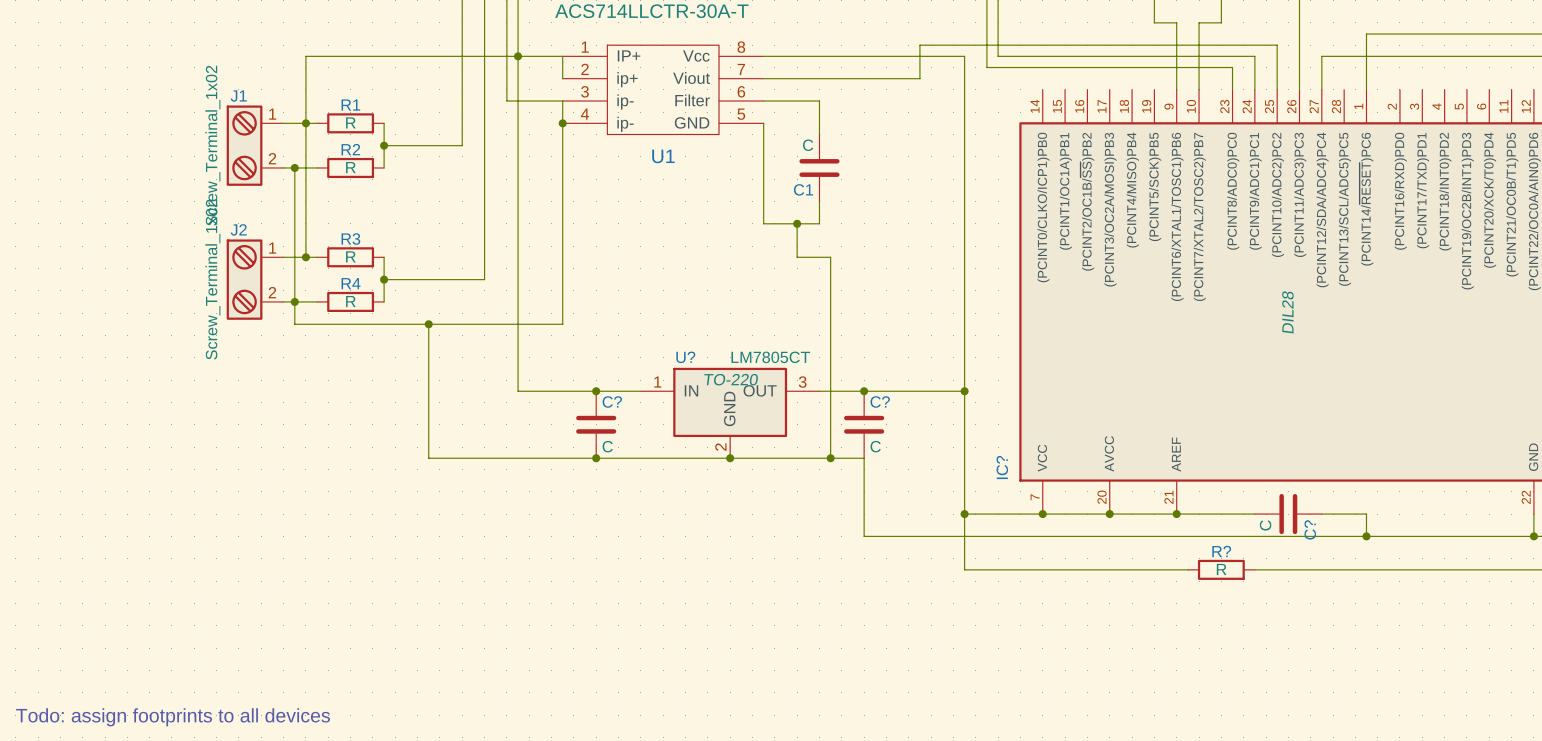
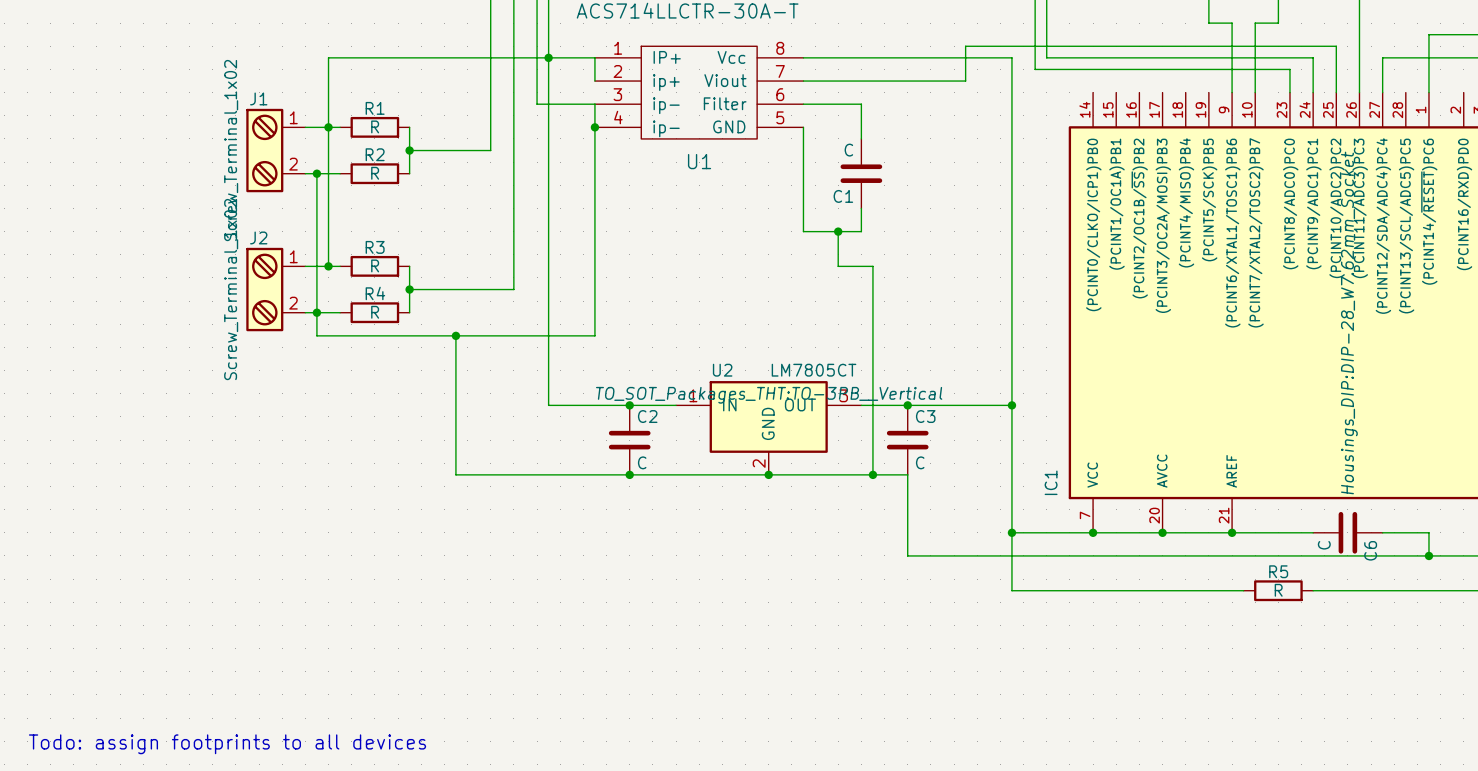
IC? text: DIL28 (1287, 312) -> Housings_DIP:DIP-28_W7.62mm_Socket (1349, 322)
U? name: U? (685, 357) -> U2 (722, 370)
U? text: TO-220 (731, 379) -> TO_SOT_Packages_THT:TO-3PB__Vertical (769, 395)
C? name: C? (612, 402) -> C2 (647, 416)
C? name: C? (880, 402) -> C3 (925, 416)
IC? name: IC? (1002, 467) -> IC1 (1051, 482)
C? name: C? (1310, 529) -> C6 (1370, 550)
R? name: R? (1221, 551) -> R5 (1278, 571)

